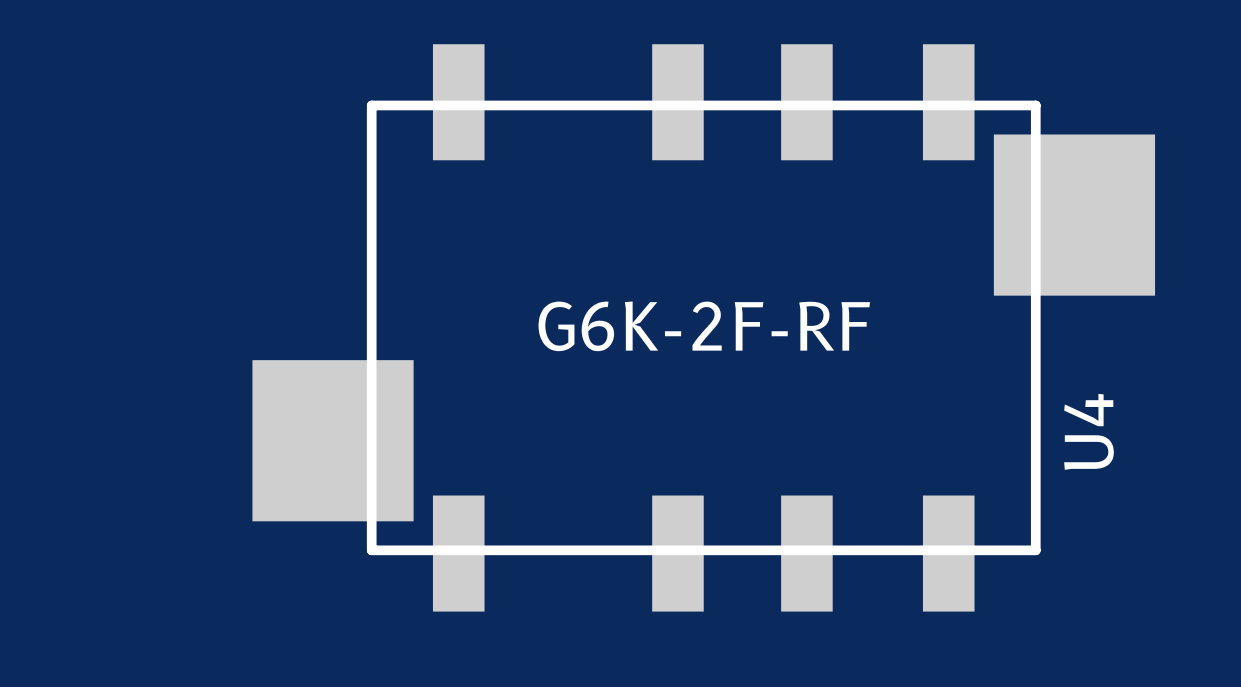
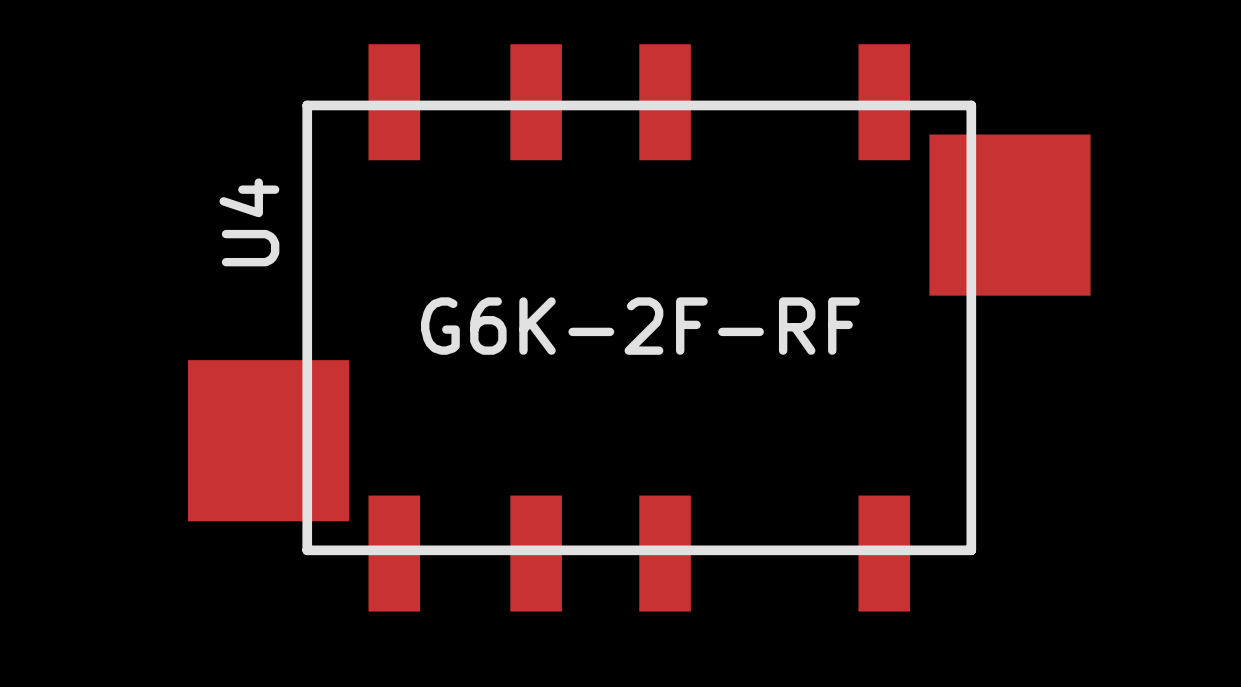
U4 rotation: 0° (703, 327) -> 180° (639, 327)

